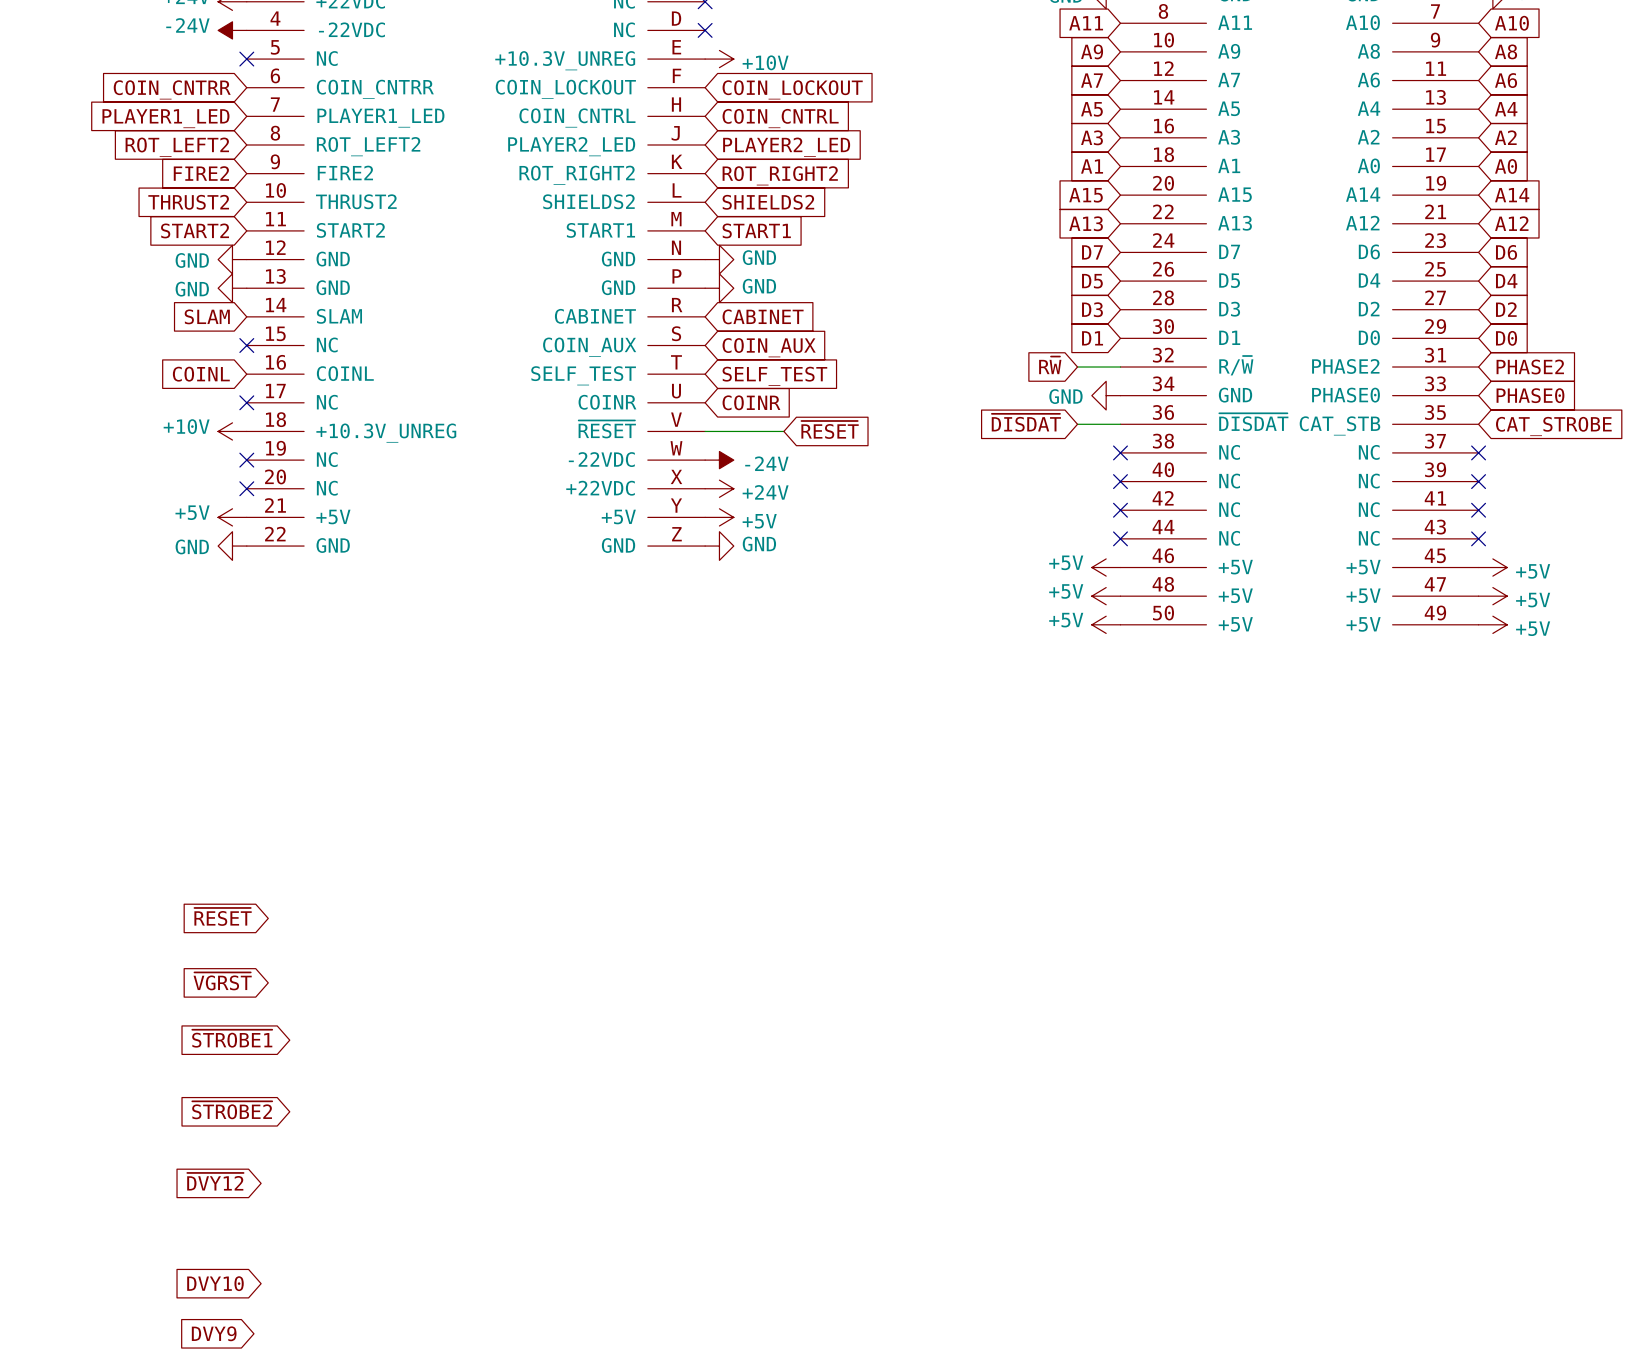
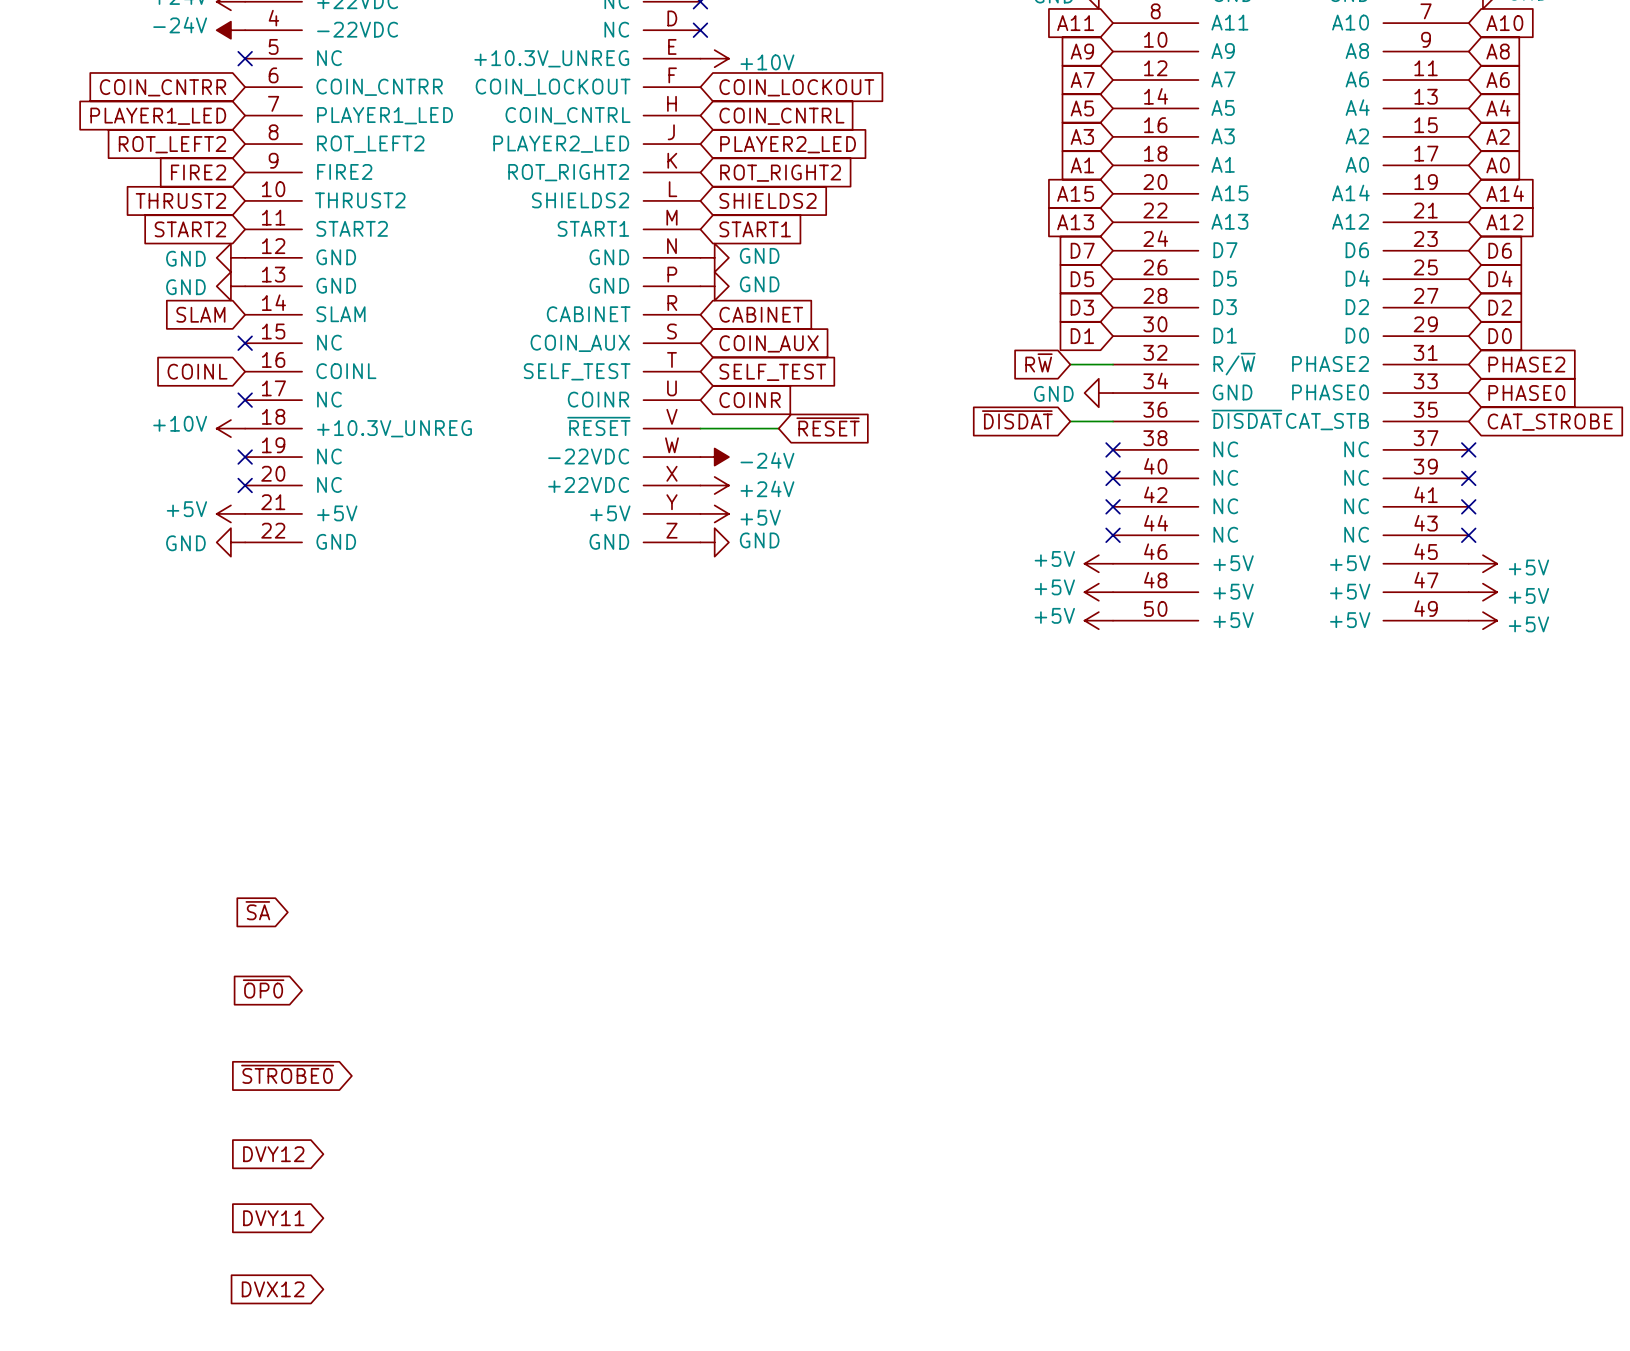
global label: ~{RESET} (223, 916) -> ~{SA} (257, 910)
global label: ~{VGRST} (222, 981) -> none
global label: none -> ~{OP0} (263, 988)
global label: ~{STROBE1} (232, 1038) -> none
global label: ~{STROBE2} (232, 1110) -> ~{STROBE0} (287, 1074)
global label: ~{DVY12} (215, 1181) -> DVY12 (273, 1154)
global label: none -> DVY11 (273, 1218)
global label: DVY10 (215, 1283) -> none
global label: none -> DVX12 (273, 1289)
global label: DVY9 (214, 1333) -> none

